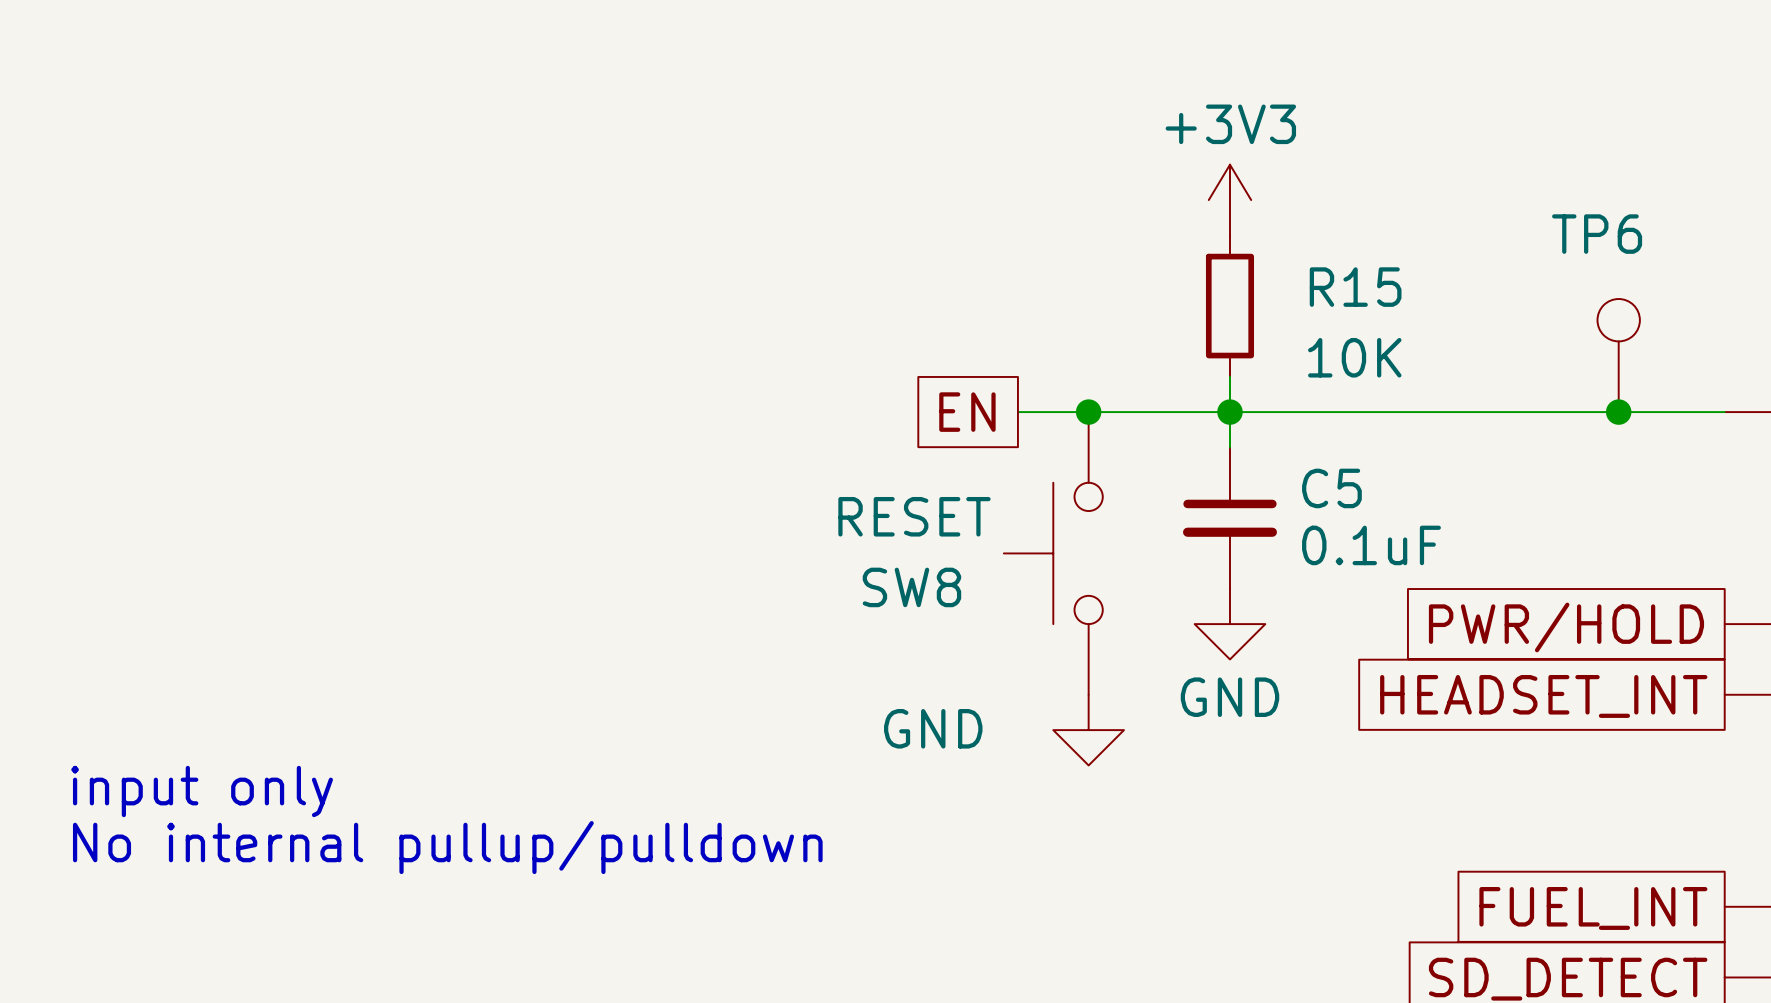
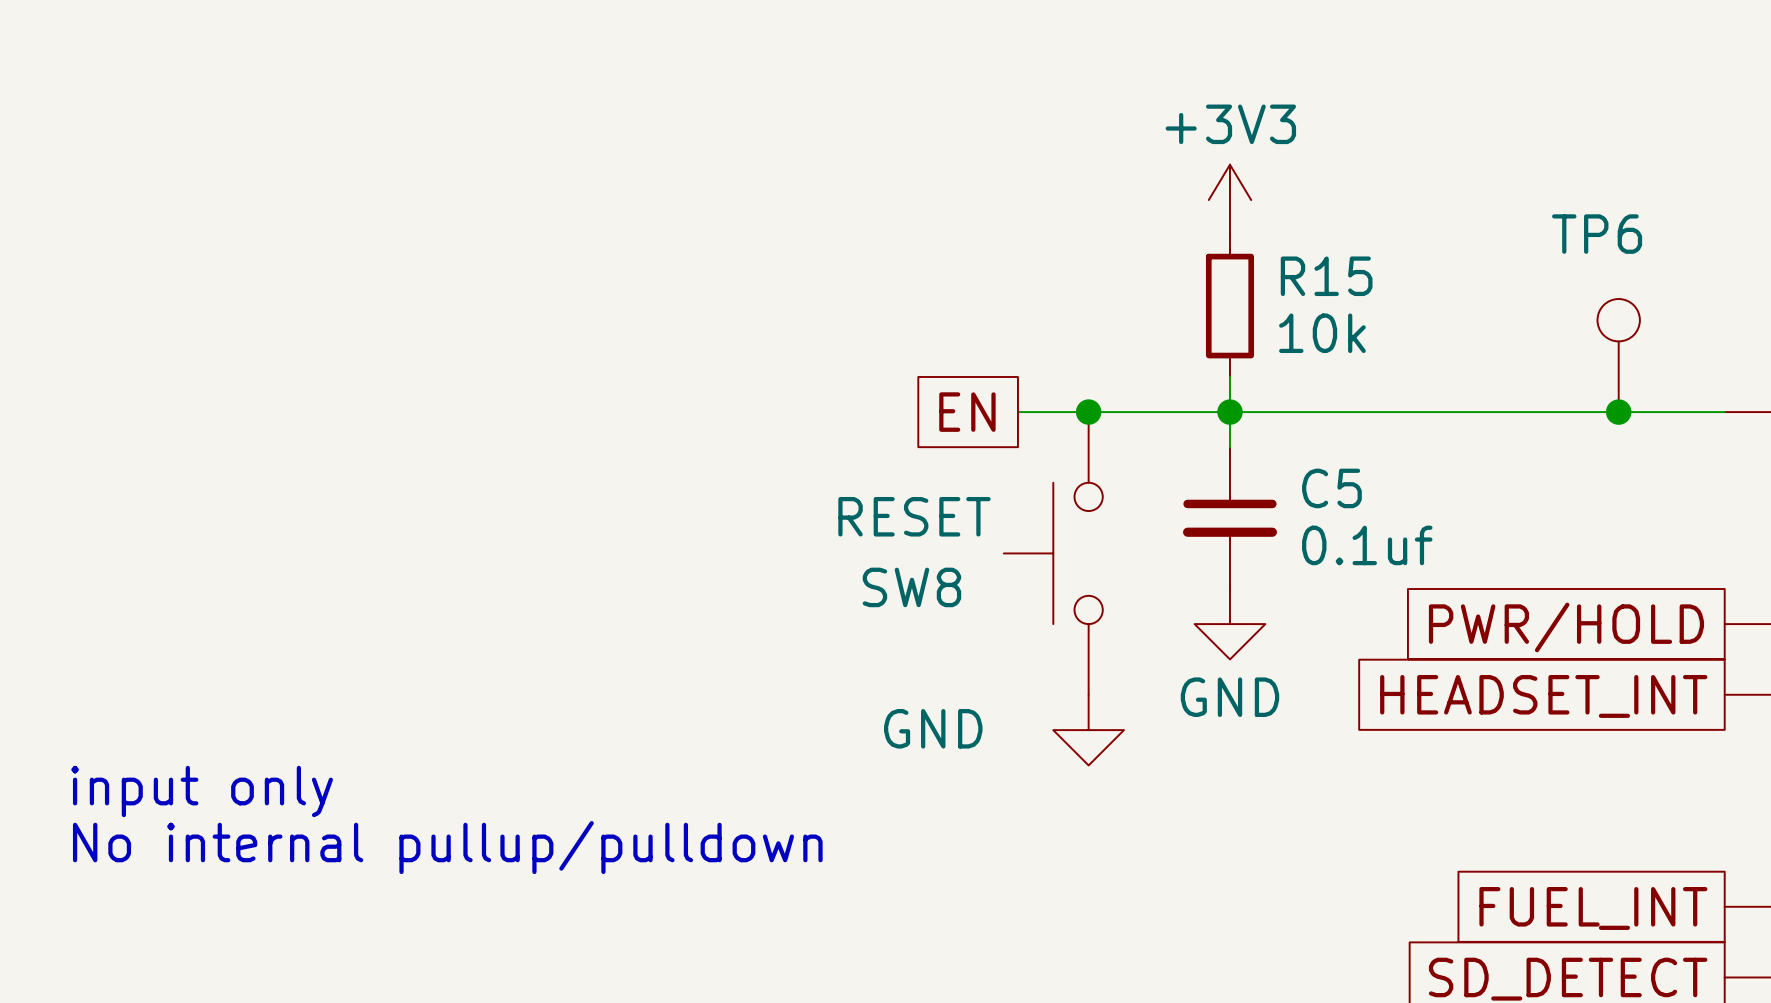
R15 name position: R15 (1355, 287) -> R15 (1326, 276)
R15 value: 10K (1354, 357) -> 10k (1322, 333)
C5 value: 0.1uF (1371, 545) -> 0.1uf (1367, 545)

